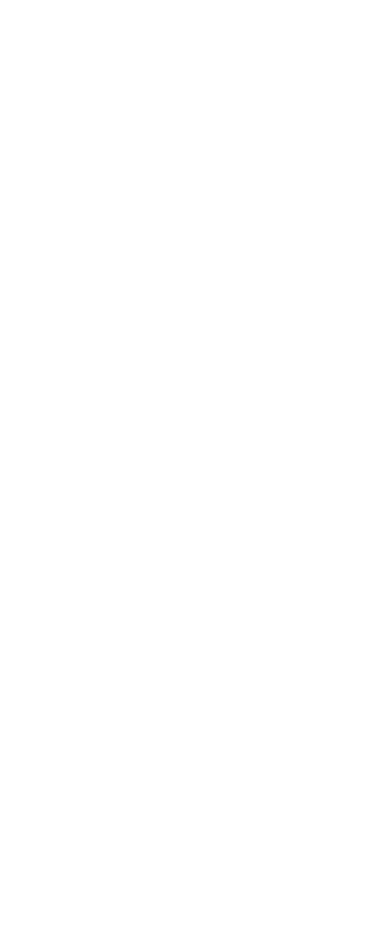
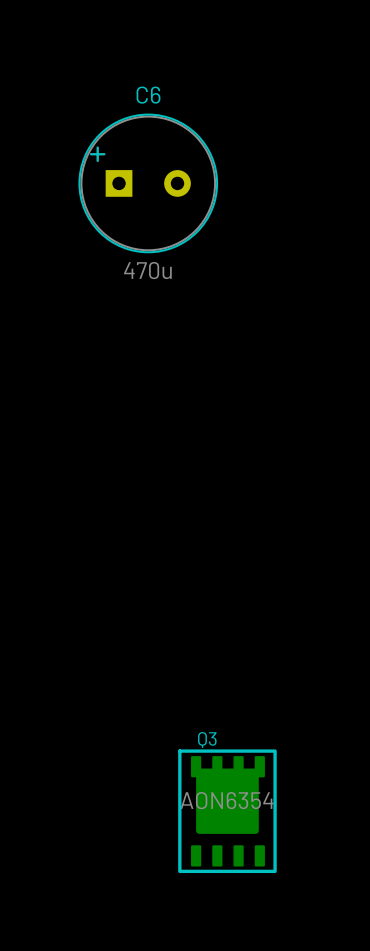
C6: none -> 470u (148, 183)
Q3: none -> AON6354 (227, 811)

